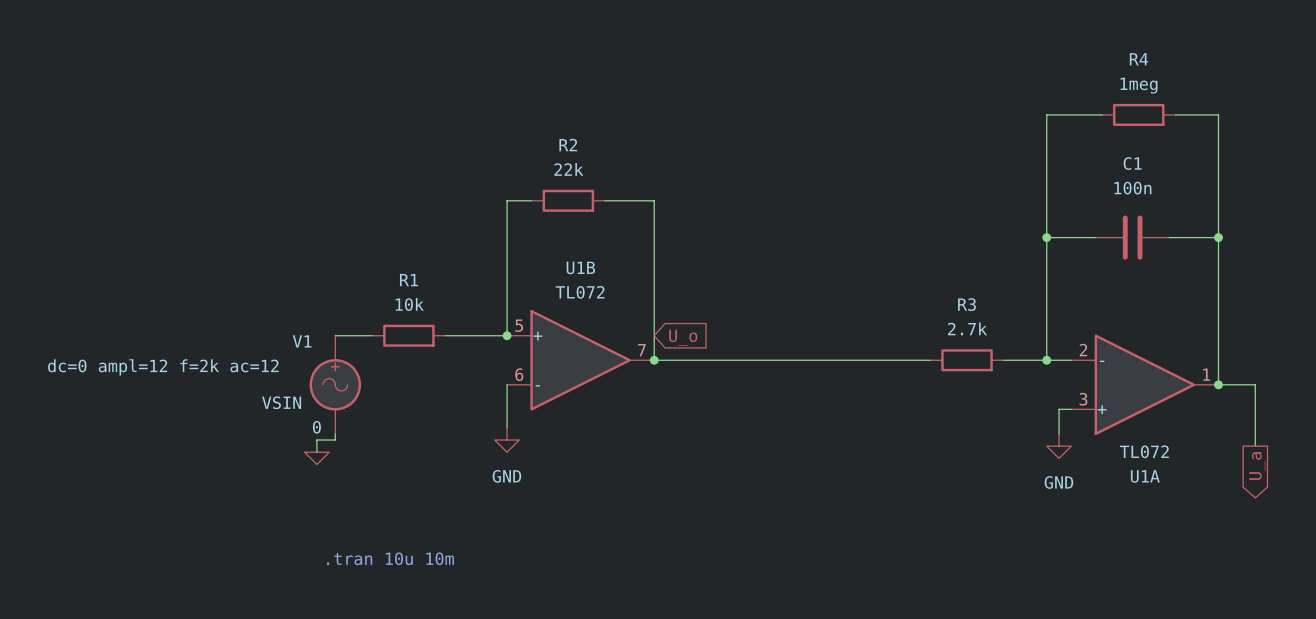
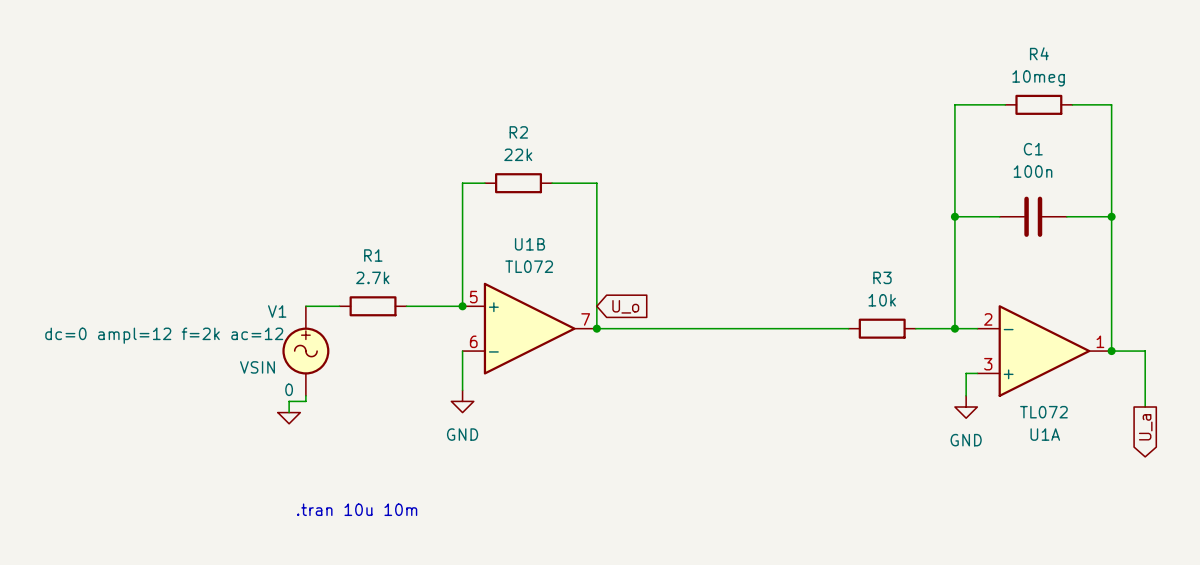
R4 value: 1meg (1138, 85) -> 10meg (1038, 78)
R1 value: 10k (409, 304) -> 2.7k (372, 277)
R3 value: 2.7k (967, 328) -> 10k (882, 300)

